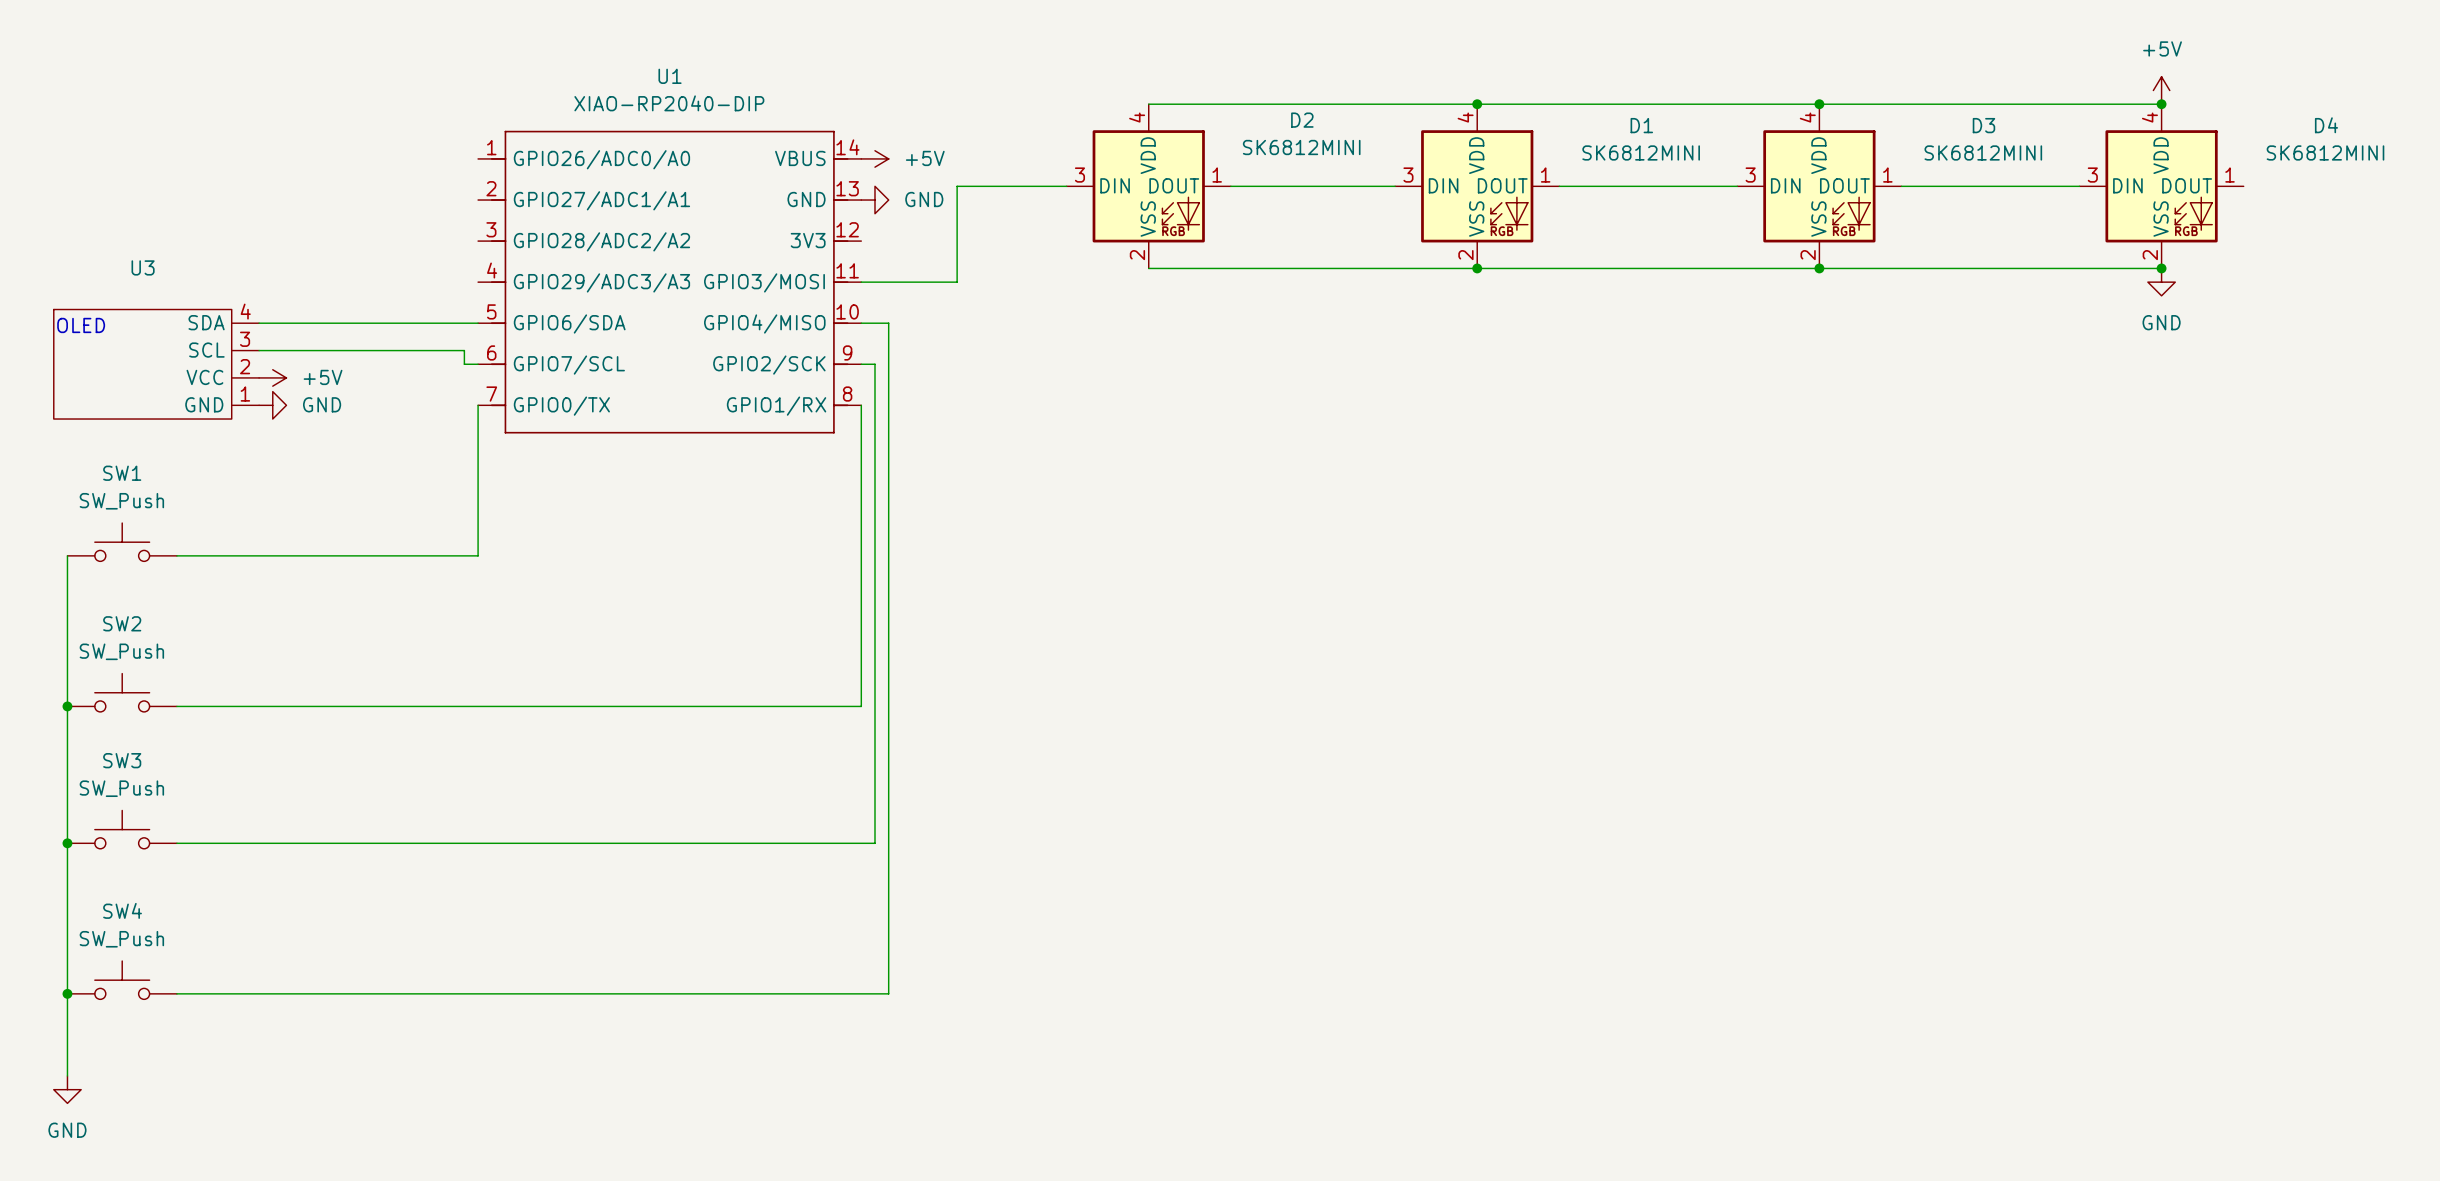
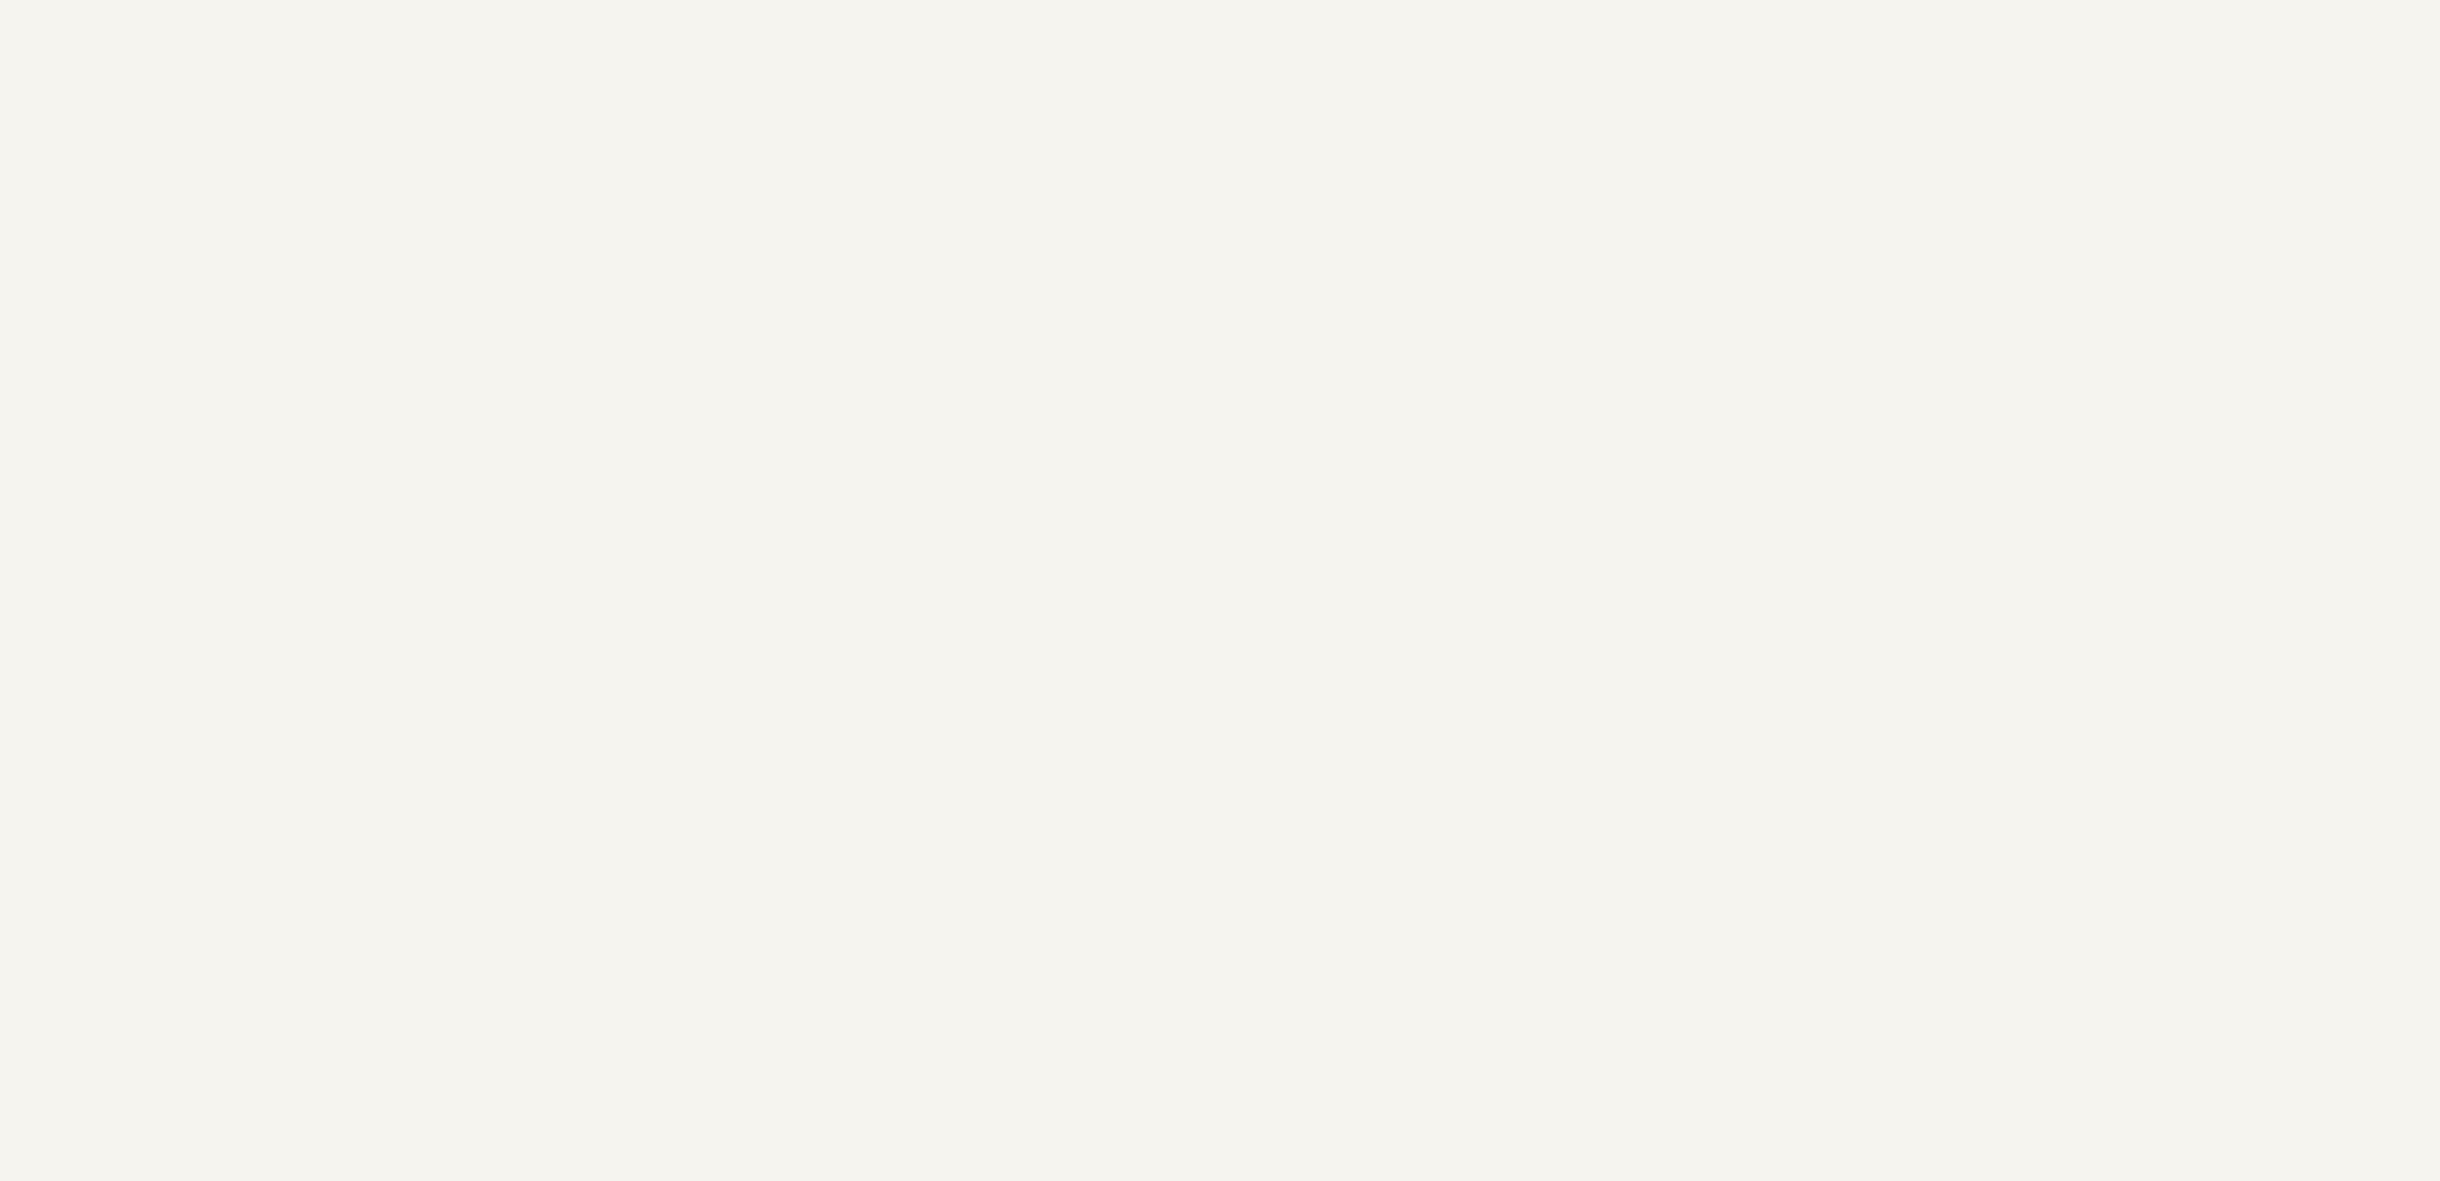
power symbol: +5V (2161, 90) -> none
wire: (1148, 104) (2161, 104) -> none
junction: (1477, 104) -> none
junction: (1819, 104) -> none
junction: (2161, 104) -> none
power symbol: +5V (874, 158) -> none
wire: (1066, 186) (957, 186) (957, 282) (861, 282) -> none
D2: SK6812MINI (1148, 186) -> none
wire: (1230, 186) (1395, 186) -> none
D1: SK6812MINI (1477, 186) -> none
wire: (1559, 186) (1737, 186) -> none
D3: SK6812MINI (1819, 186) -> none
wire: (1901, 186) (2079, 186) -> none
D4: SK6812MINI (2161, 186) -> none
power symbol: GND (874, 200) -> none
wire: (1148, 268) (2161, 268) -> none
junction: (1477, 268) -> none
junction: (1819, 268) -> none
junction: (2161, 268) -> none
U1: XIAO-RP2040-DIP (669, 282) -> none
power symbol: GND (2161, 282) -> none
wire: (259, 323) (478, 323) -> none
wire: (861, 323) (888, 323) (888, 993) (176, 993) -> none
text: OLED (81, 325) -> none
wire: (259, 350) (464, 350) (464, 364) (478, 364) -> none
U3: (156, 364) -> none
wire: (861, 364) (874, 364) (874, 843) (176, 843) -> none
power symbol: +5V (272, 377) -> none
power symbol: GND (272, 405) -> none
wire: (478, 405) (478, 555) (176, 555) -> none
wire: (861, 405) (861, 706) (176, 706) -> none
SW1: SW_Push (122, 542) -> none
wire: (67, 555) (67, 1075) -> none
SW2: SW_Push (122, 692) -> none
junction: (67, 706) -> none
SW3: SW_Push (122, 829) -> none
junction: (67, 843) -> none
SW4: SW_Push (122, 980) -> none
junction: (67, 993) -> none
power symbol: GND (67, 1089) -> none

